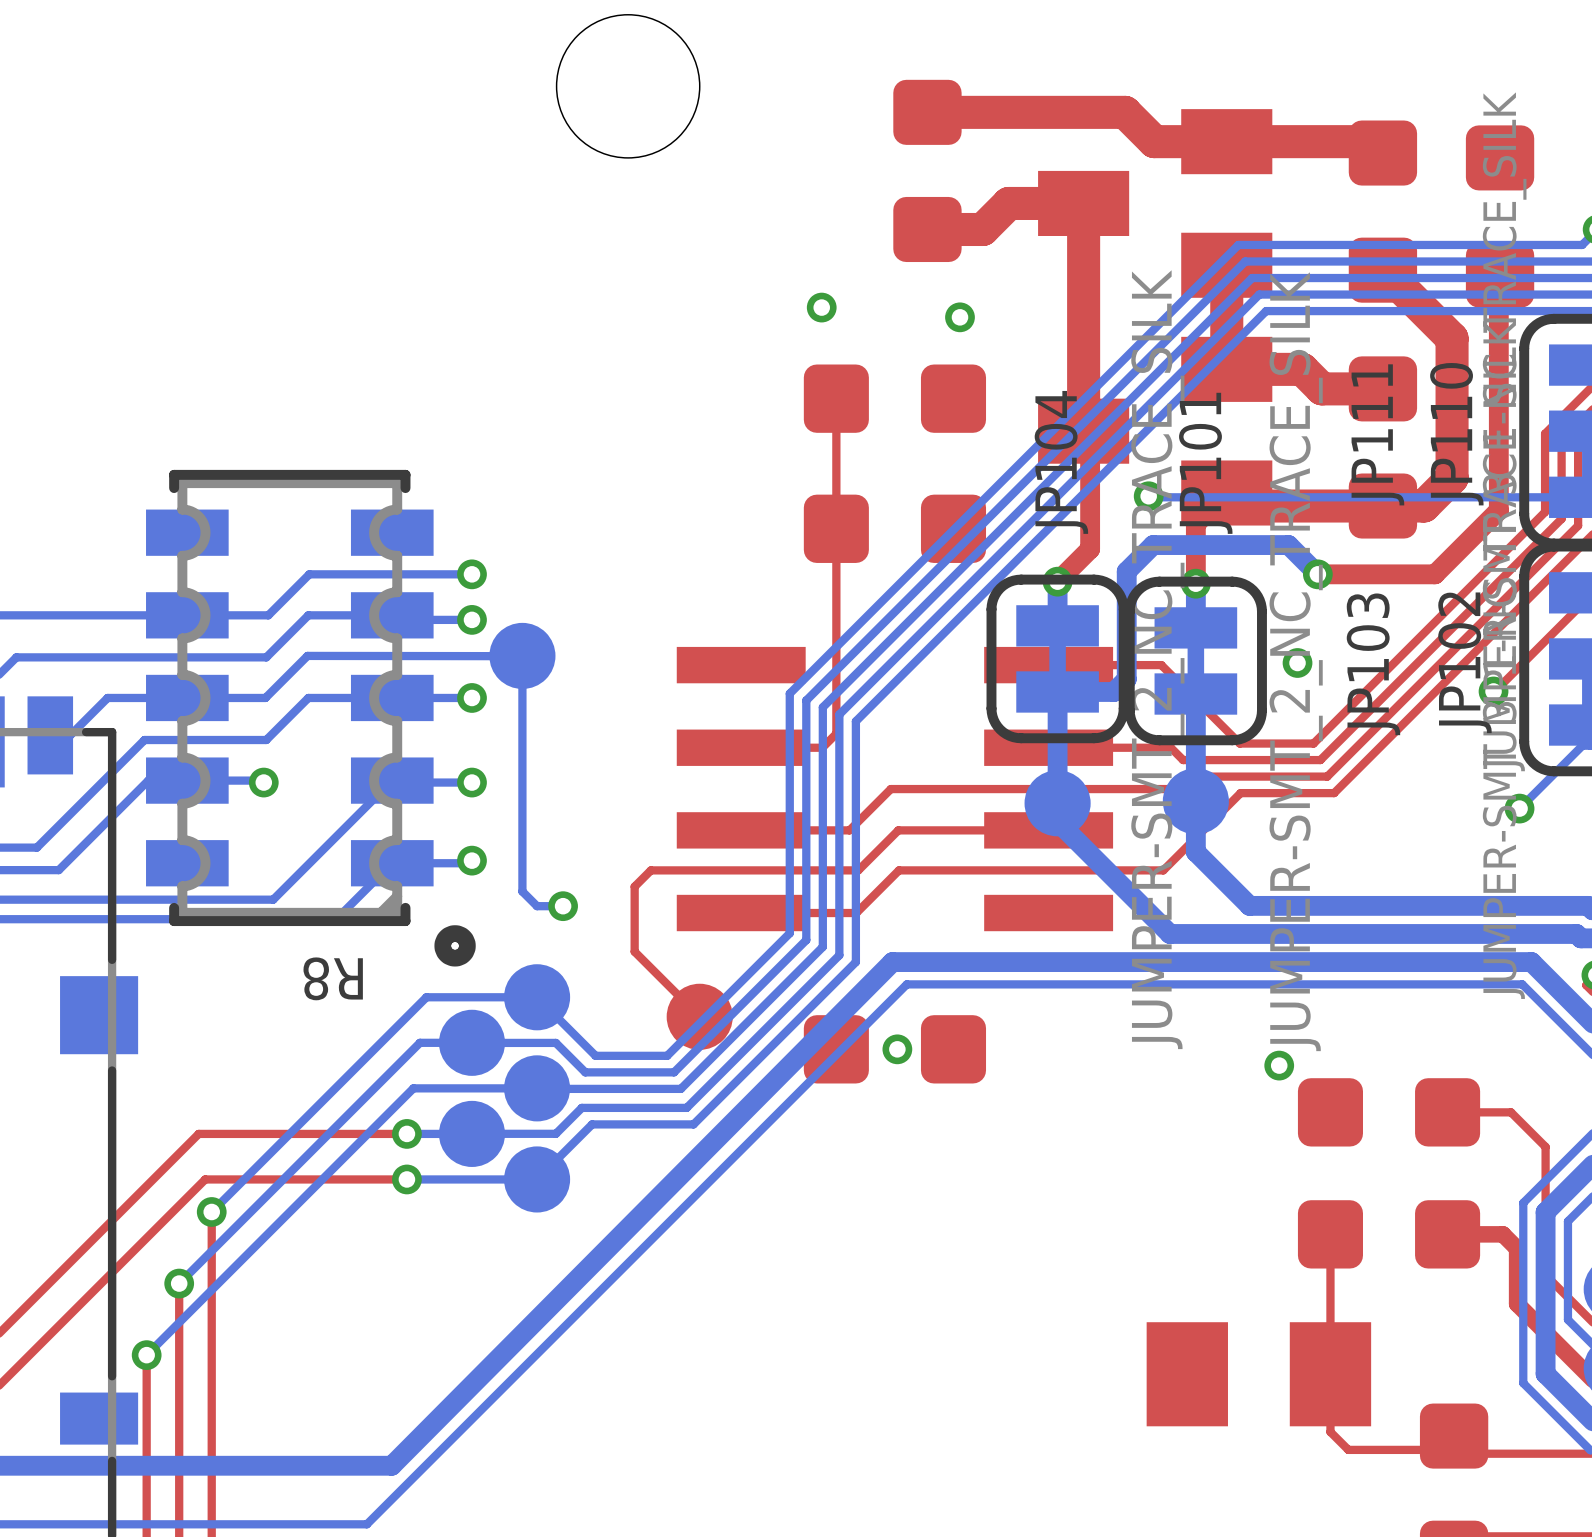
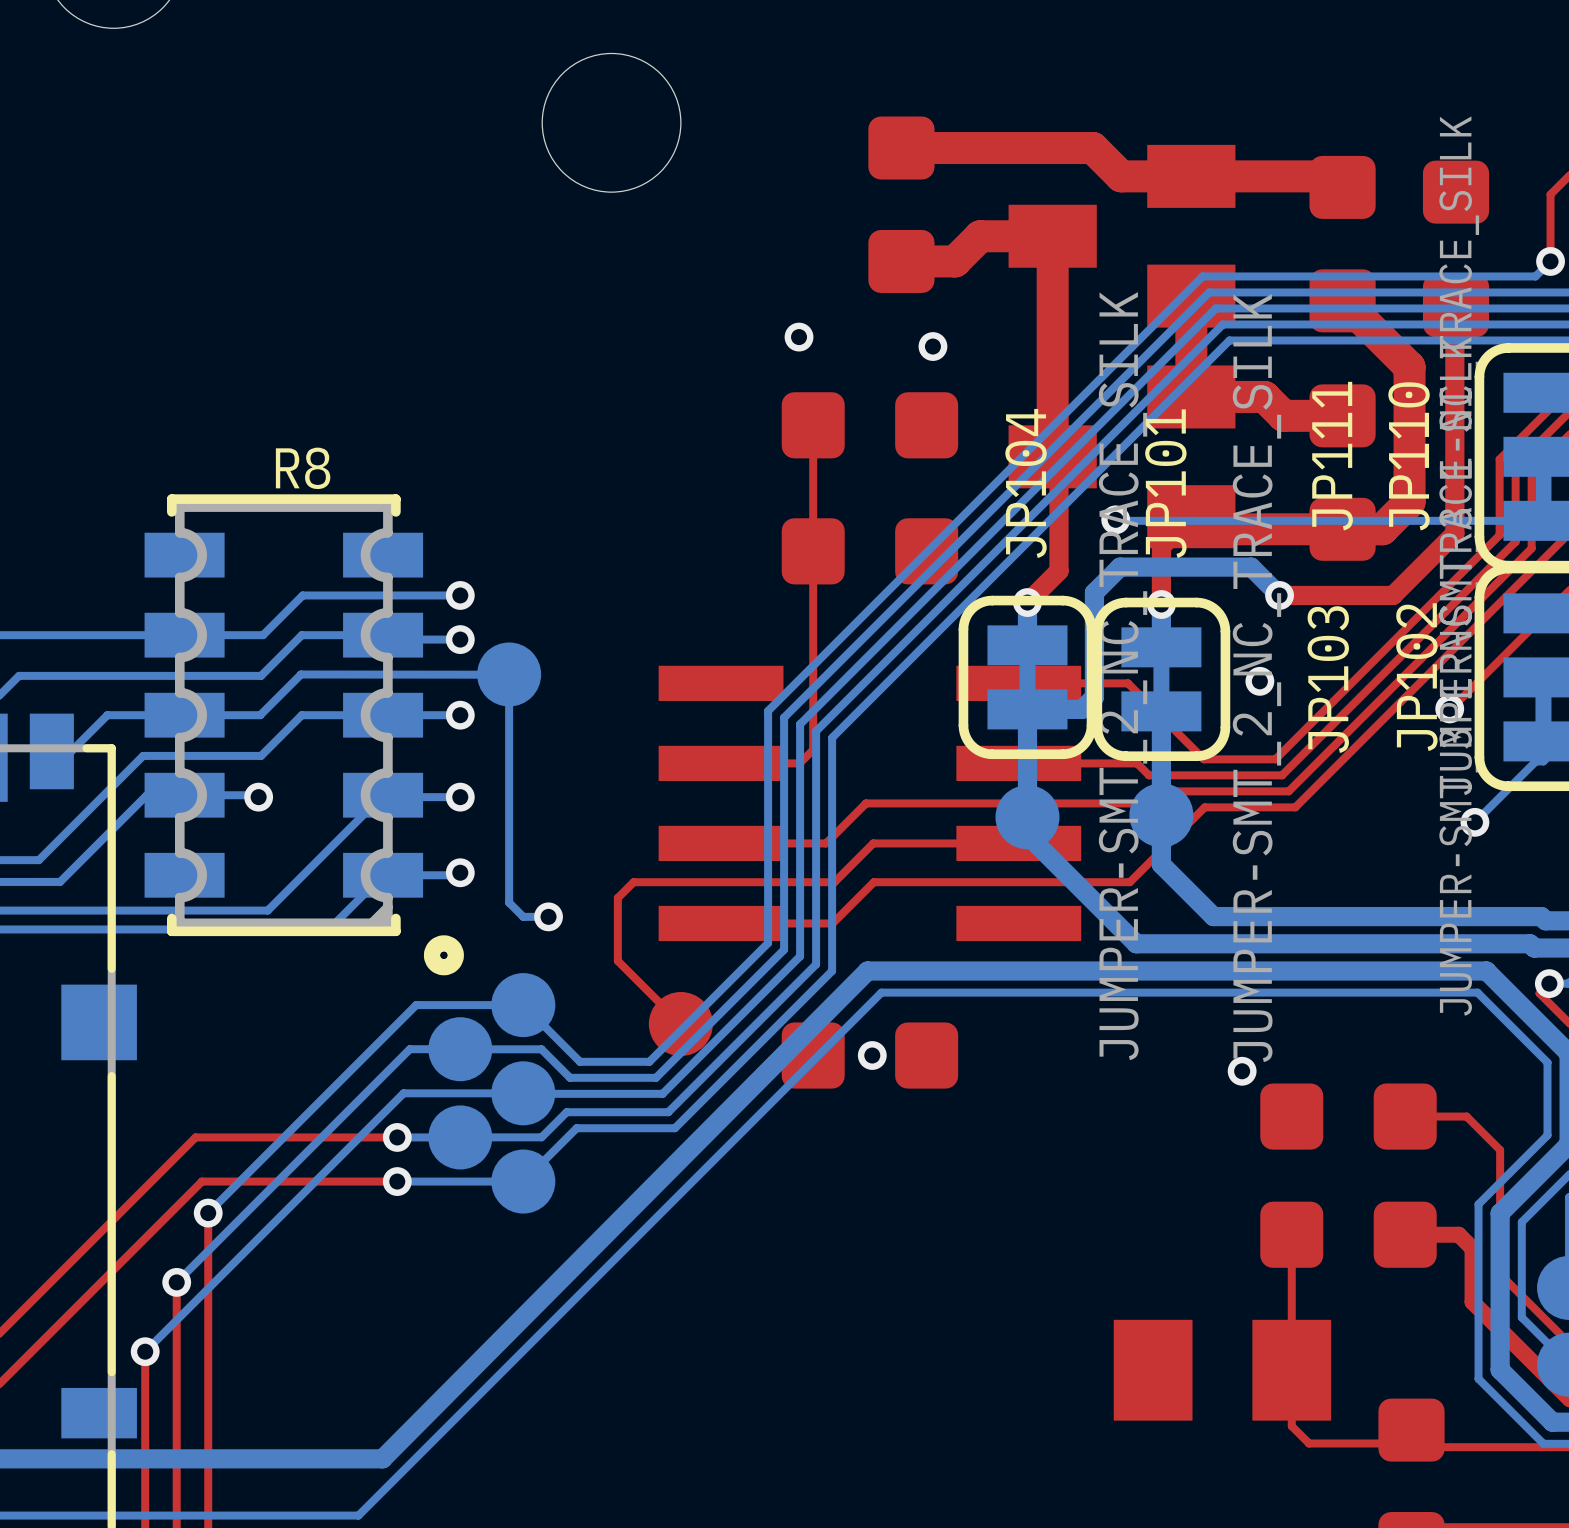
R8 name rotation: 0° (333, 978) -> 180° (303, 468)
R8 name position: R8 (333, 978) -> R8 (303, 468)

